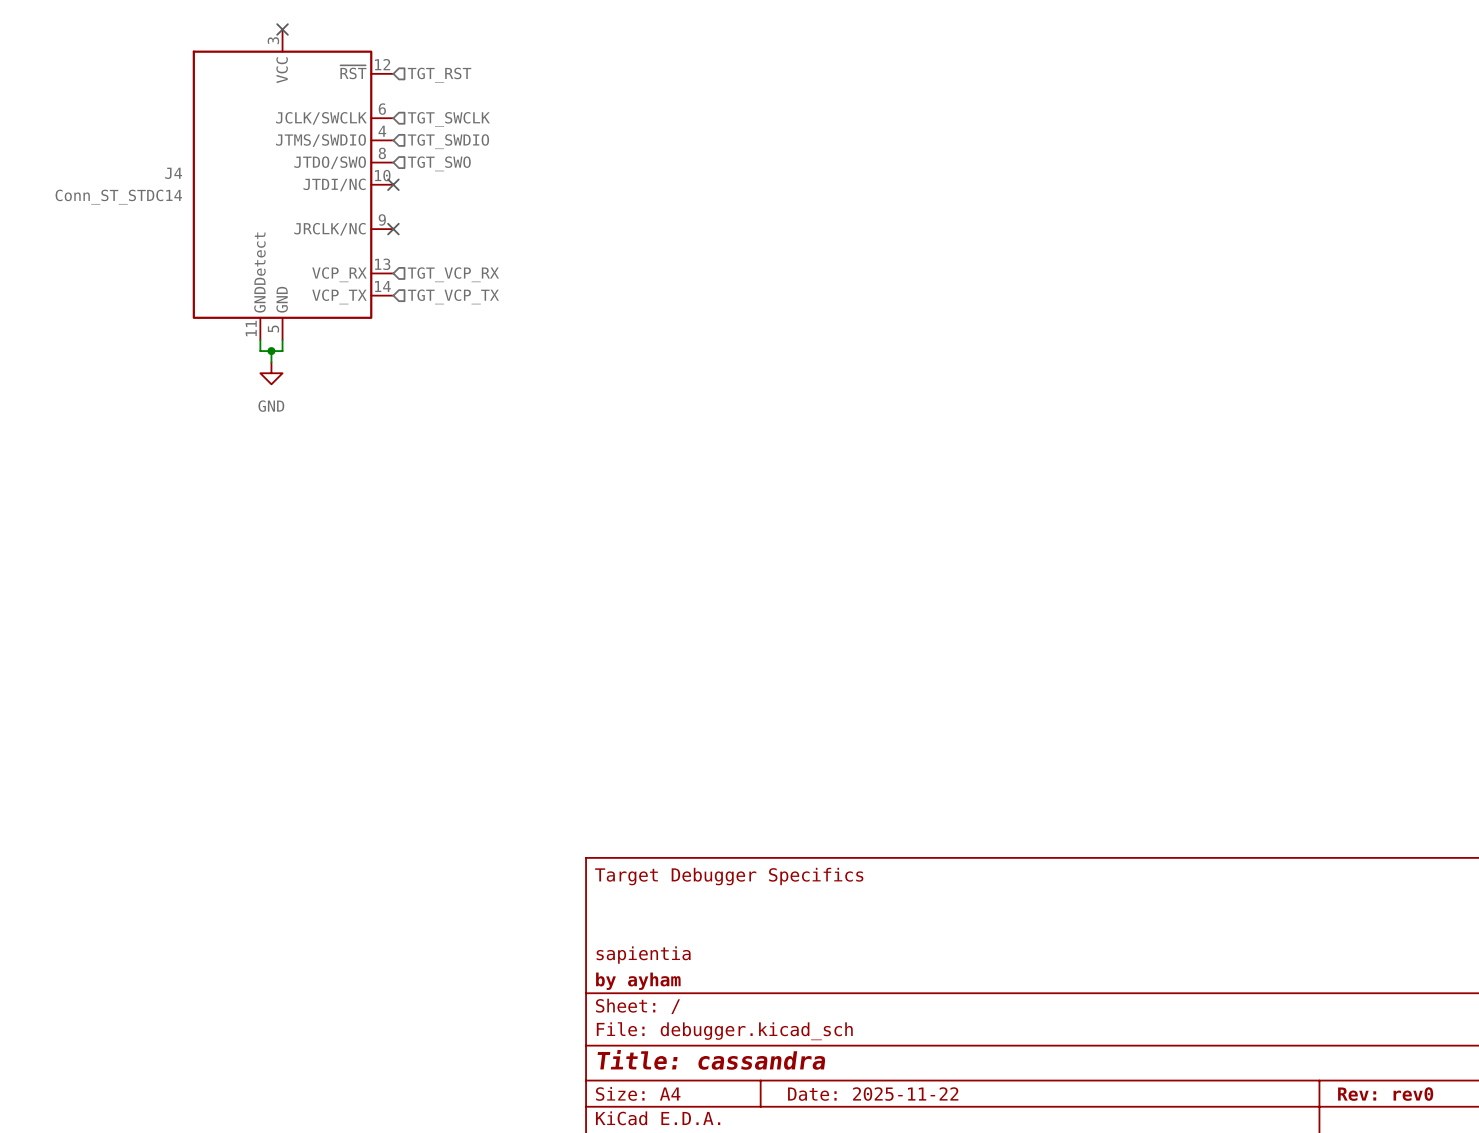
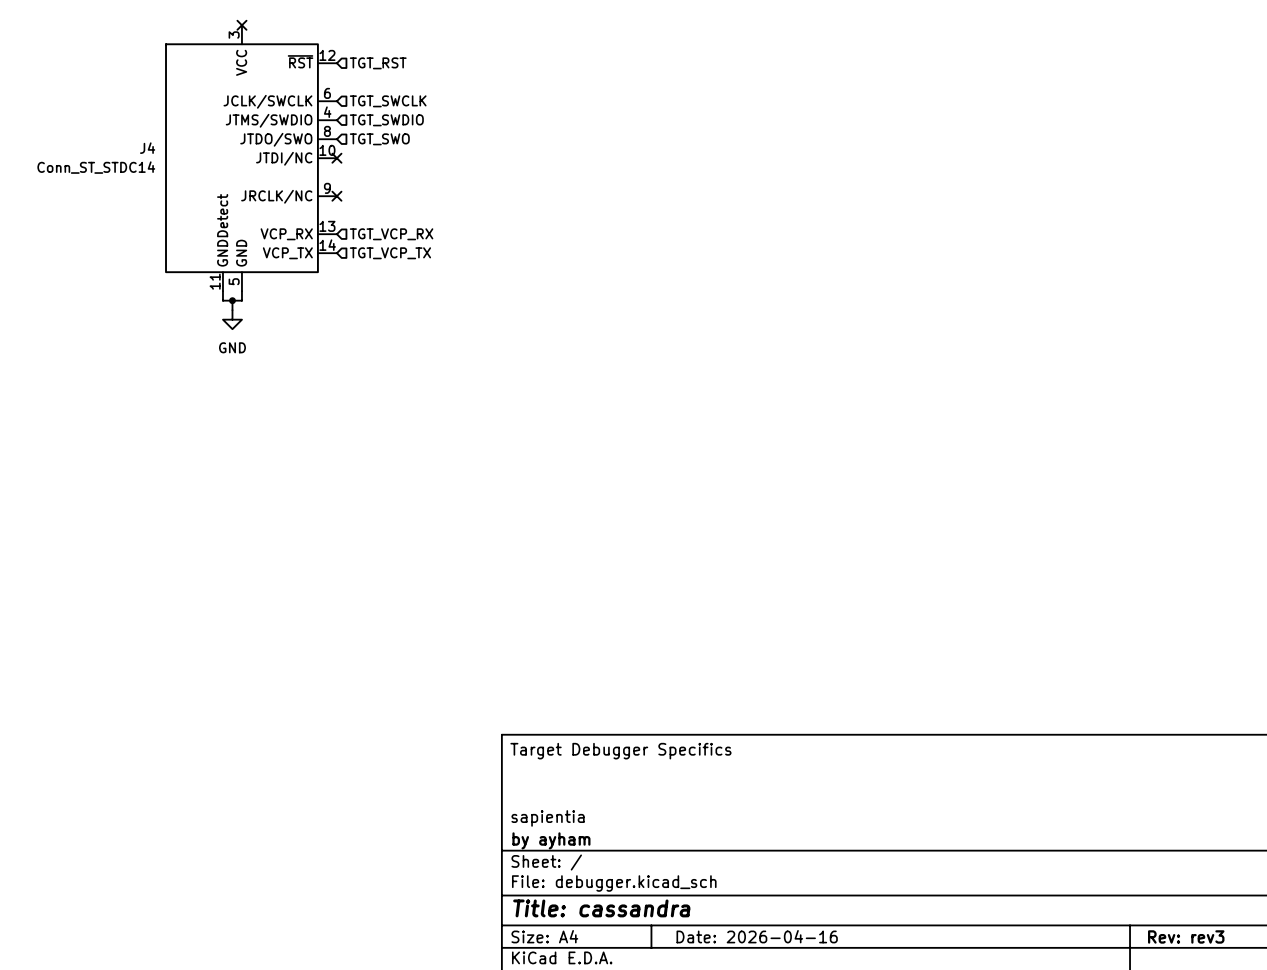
title block: Date: 2025-11-22 (873, 1094) -> Date: 2026-04-16 (757, 936)
title block: Rev: rev0 (1385, 1094) -> Rev: rev3 (1186, 936)

